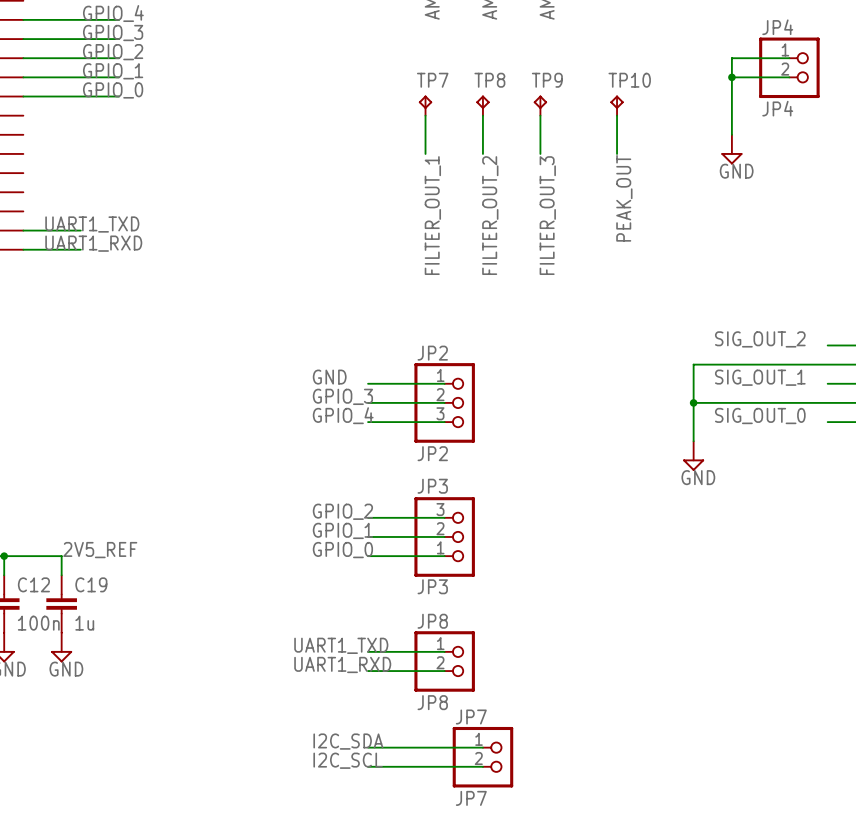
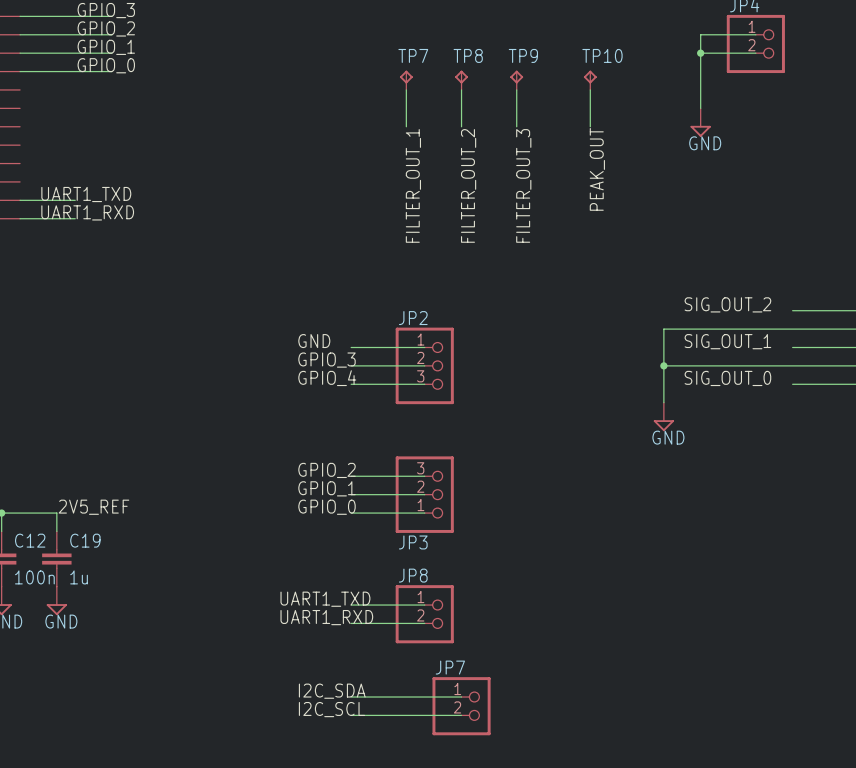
JP4 value: JP4 (777, 108) -> none
JP2 value: JP2 (432, 453) -> none
JP3 value: JP3 (432, 486) -> none
JP8 value: JP8 (432, 702) -> none
JP7 value: JP7 (471, 798) -> none

